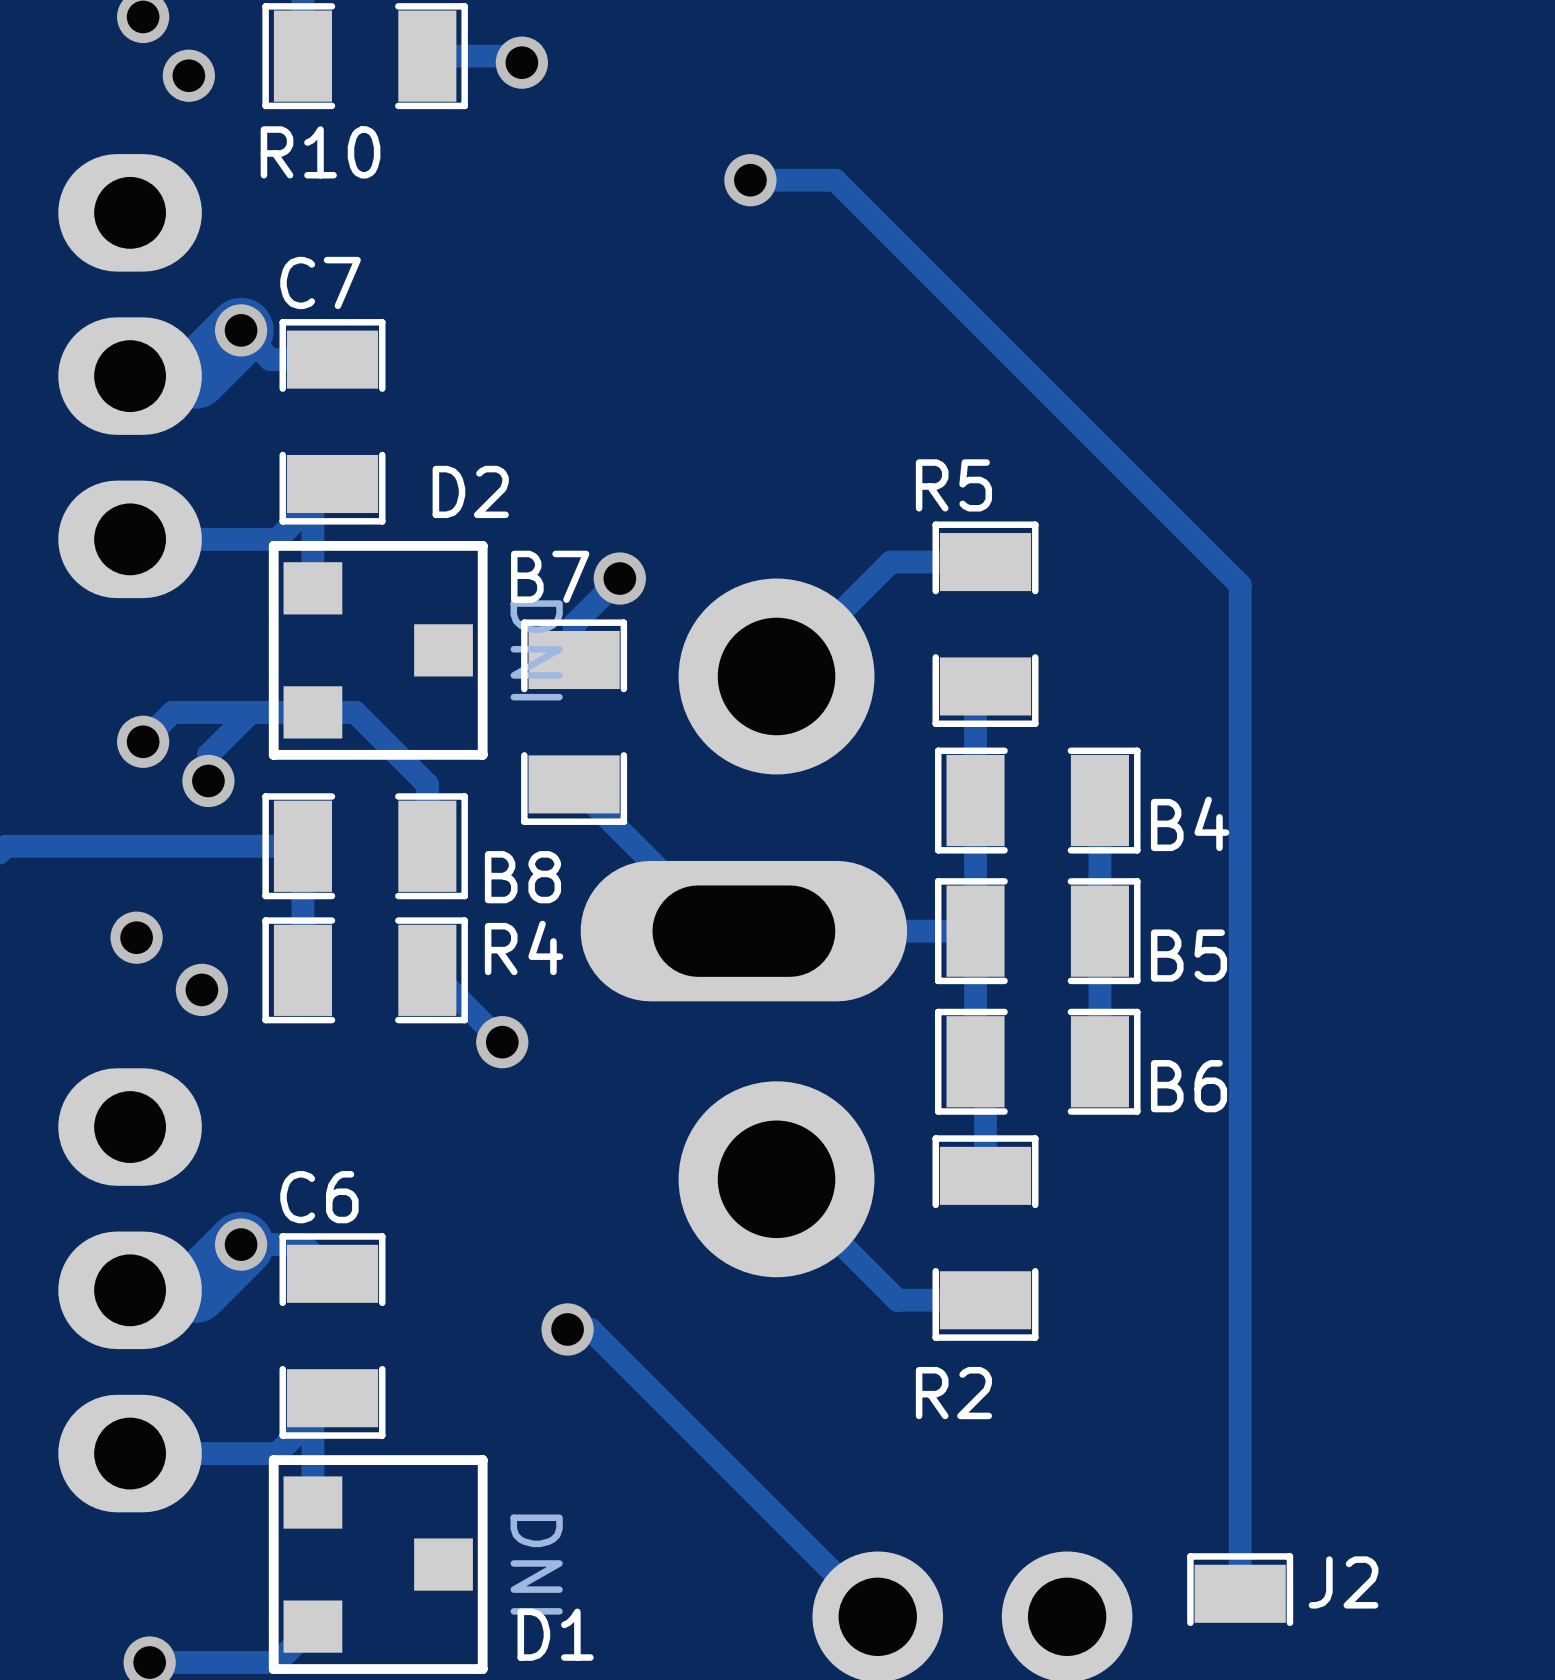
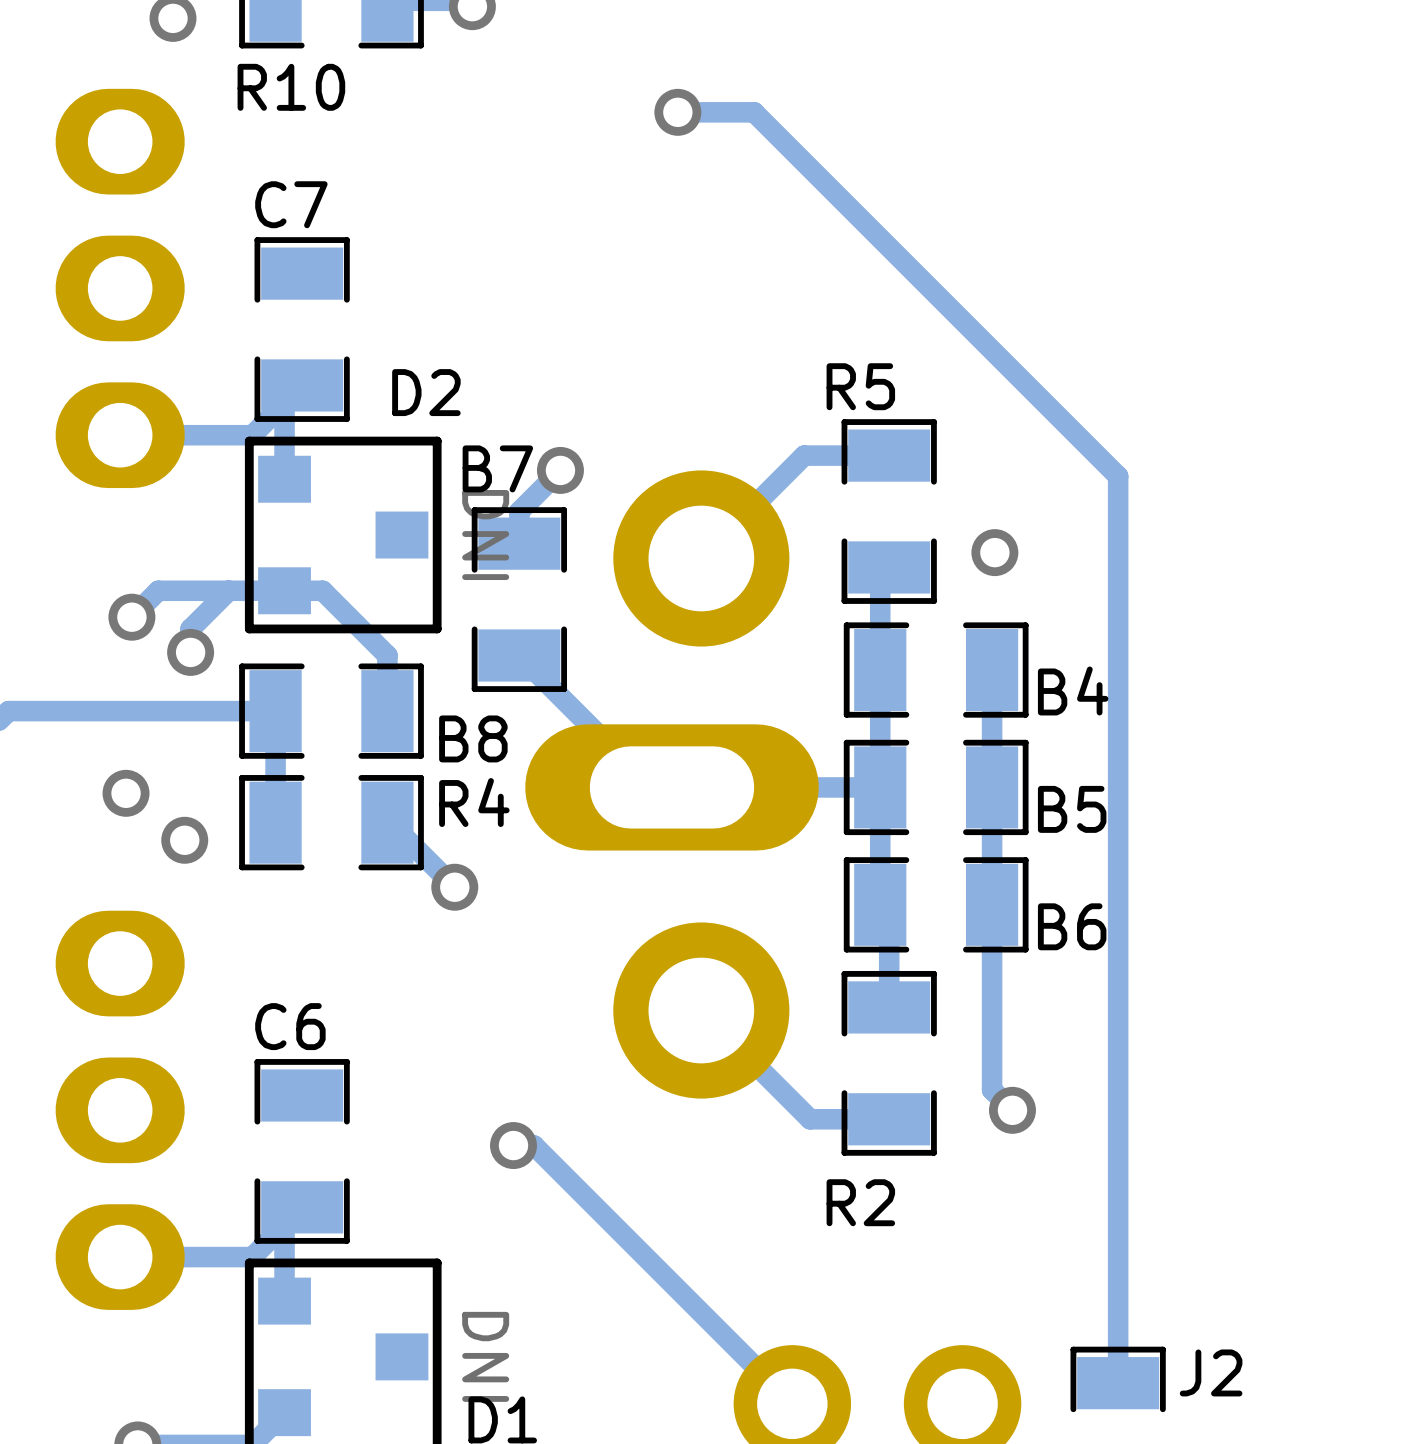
via: (241, 330) -> none
track: (332, 359) (270, 359) (241, 330) (195, 376) -> none
via: none -> (994, 552)
track: none -> (992, 904) (992, 1089) (1012, 1110)
via: (241, 1244) -> none
track: (332, 1273) (303, 1244) (241, 1244) (195, 1290) -> none
via: none -> (1012, 1110)

